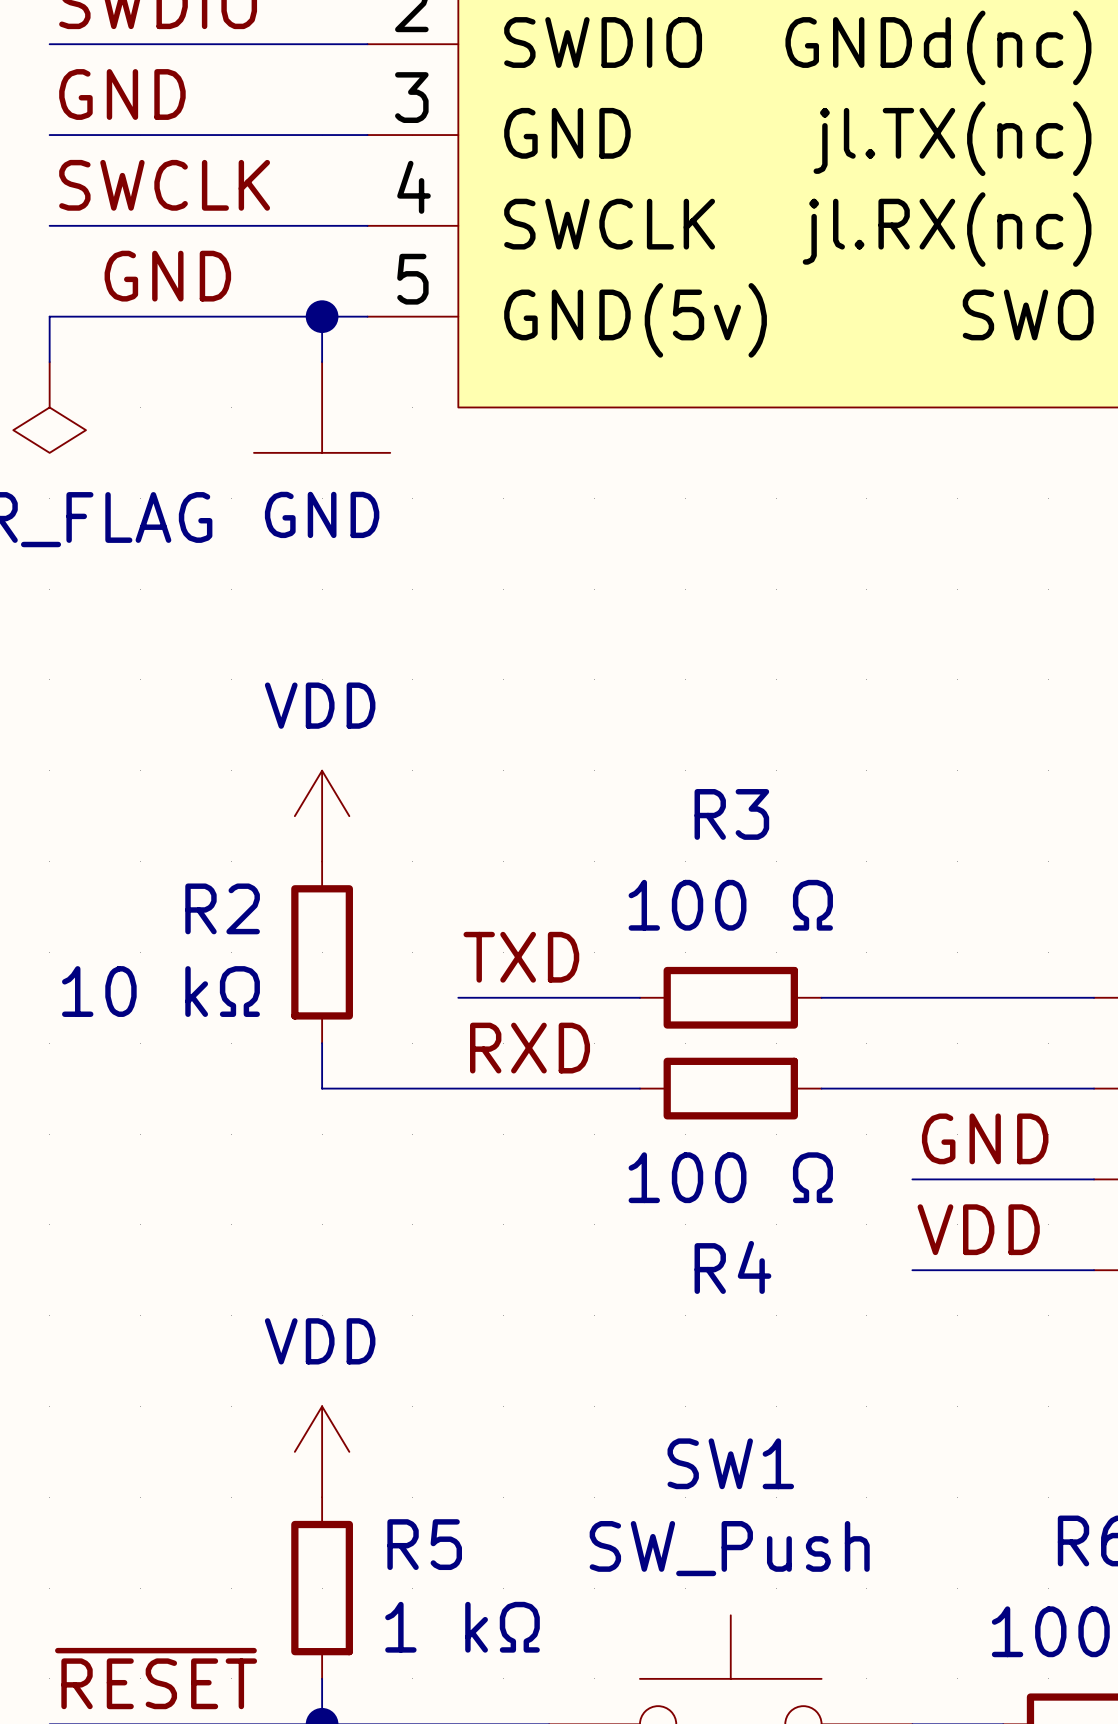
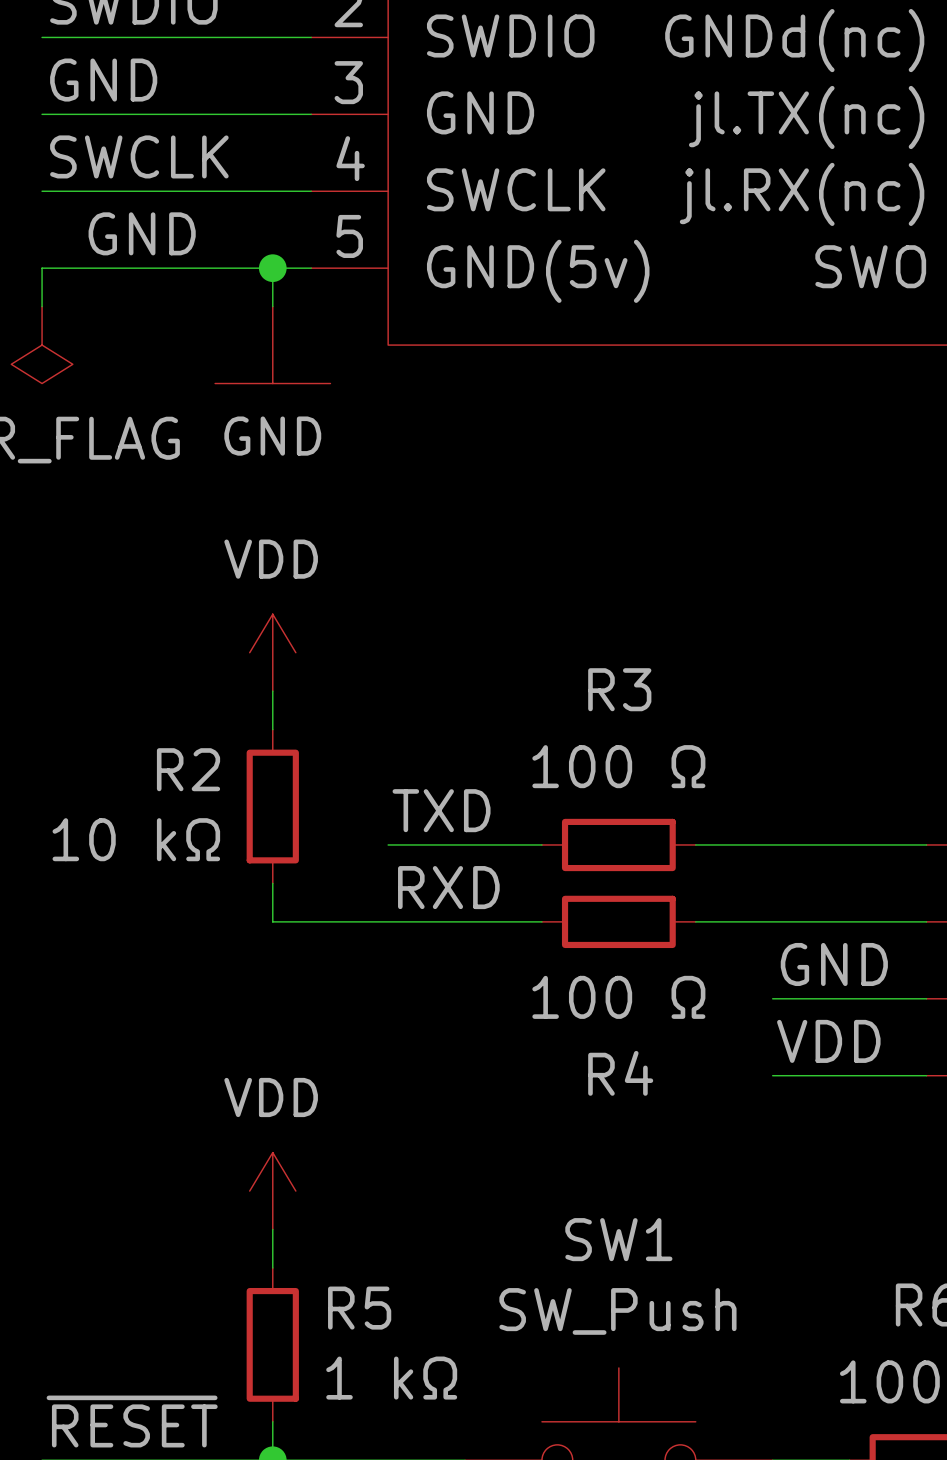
power symbol position: VDD (322, 816) -> VDD (272, 652)
power symbol position: VDD (322, 1451) -> VDD (272, 1191)

